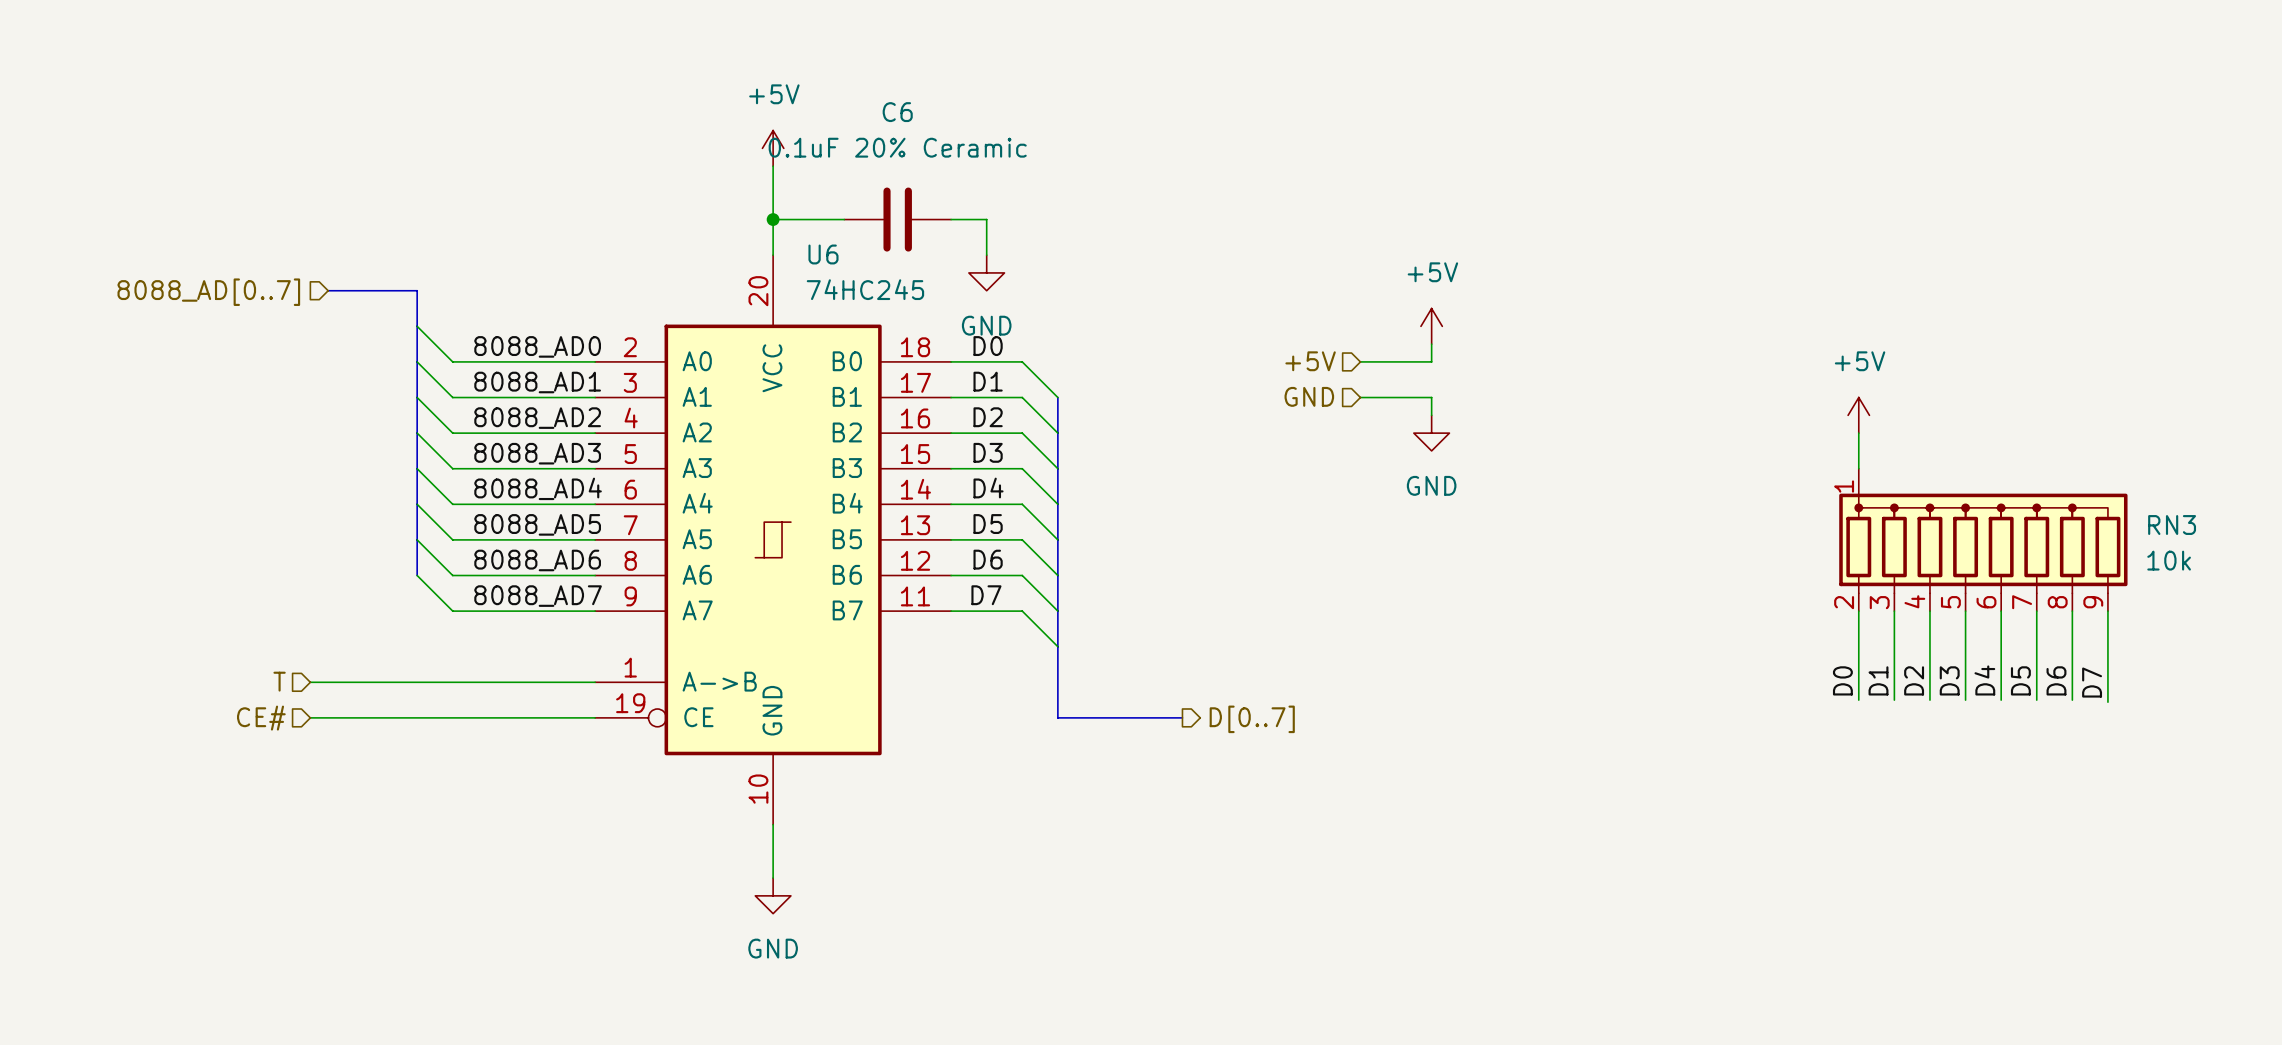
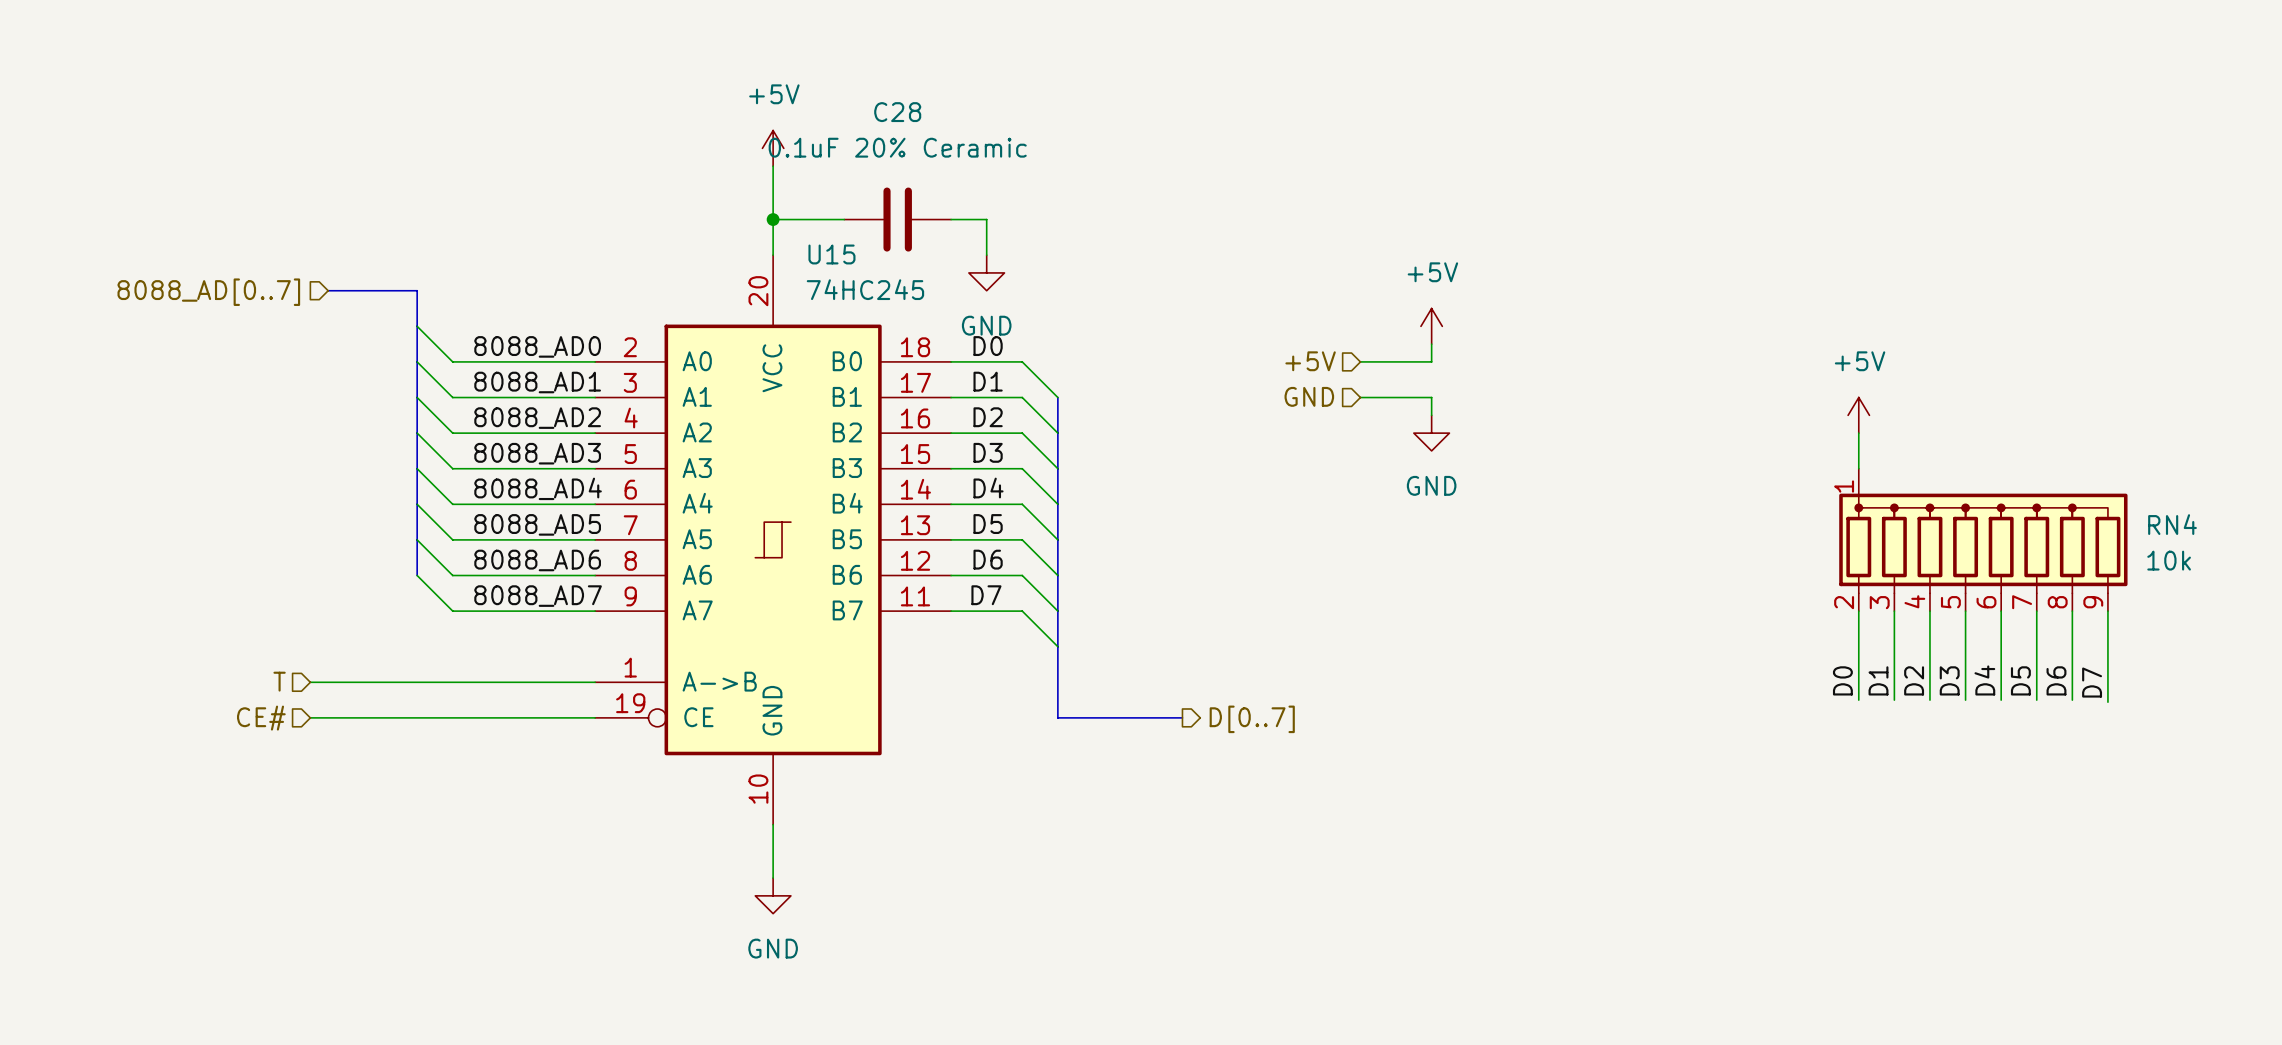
C6 name: C6 (897, 112) -> C28 (897, 112)
U6 name: U6 (823, 254) -> U15 (831, 254)
RN3 name: RN3 (2172, 525) -> RN4 (2172, 524)

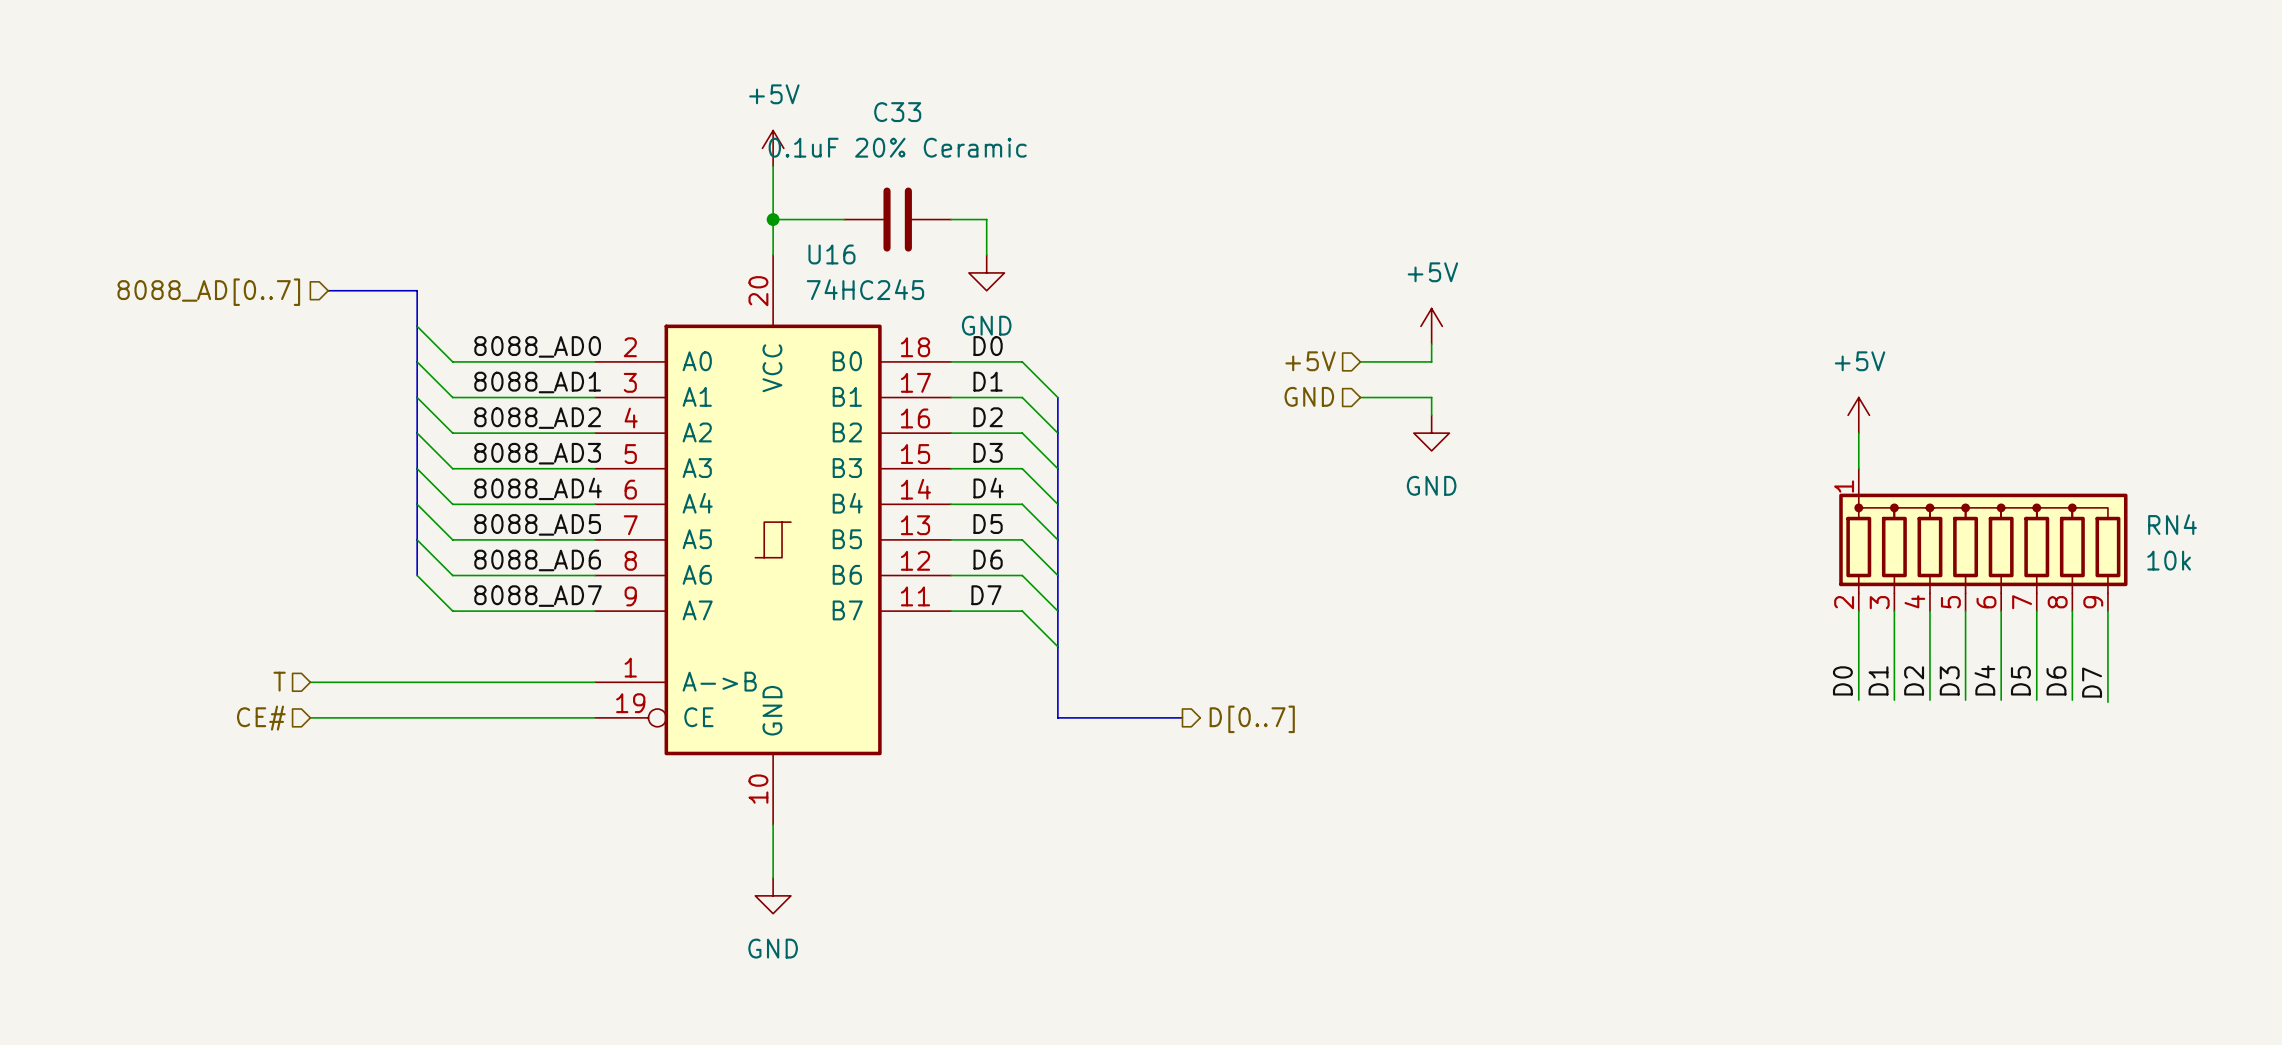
C28 name: C28 (897, 112) -> C33 (897, 112)
U15 name: U15 (831, 254) -> U16 (831, 254)

